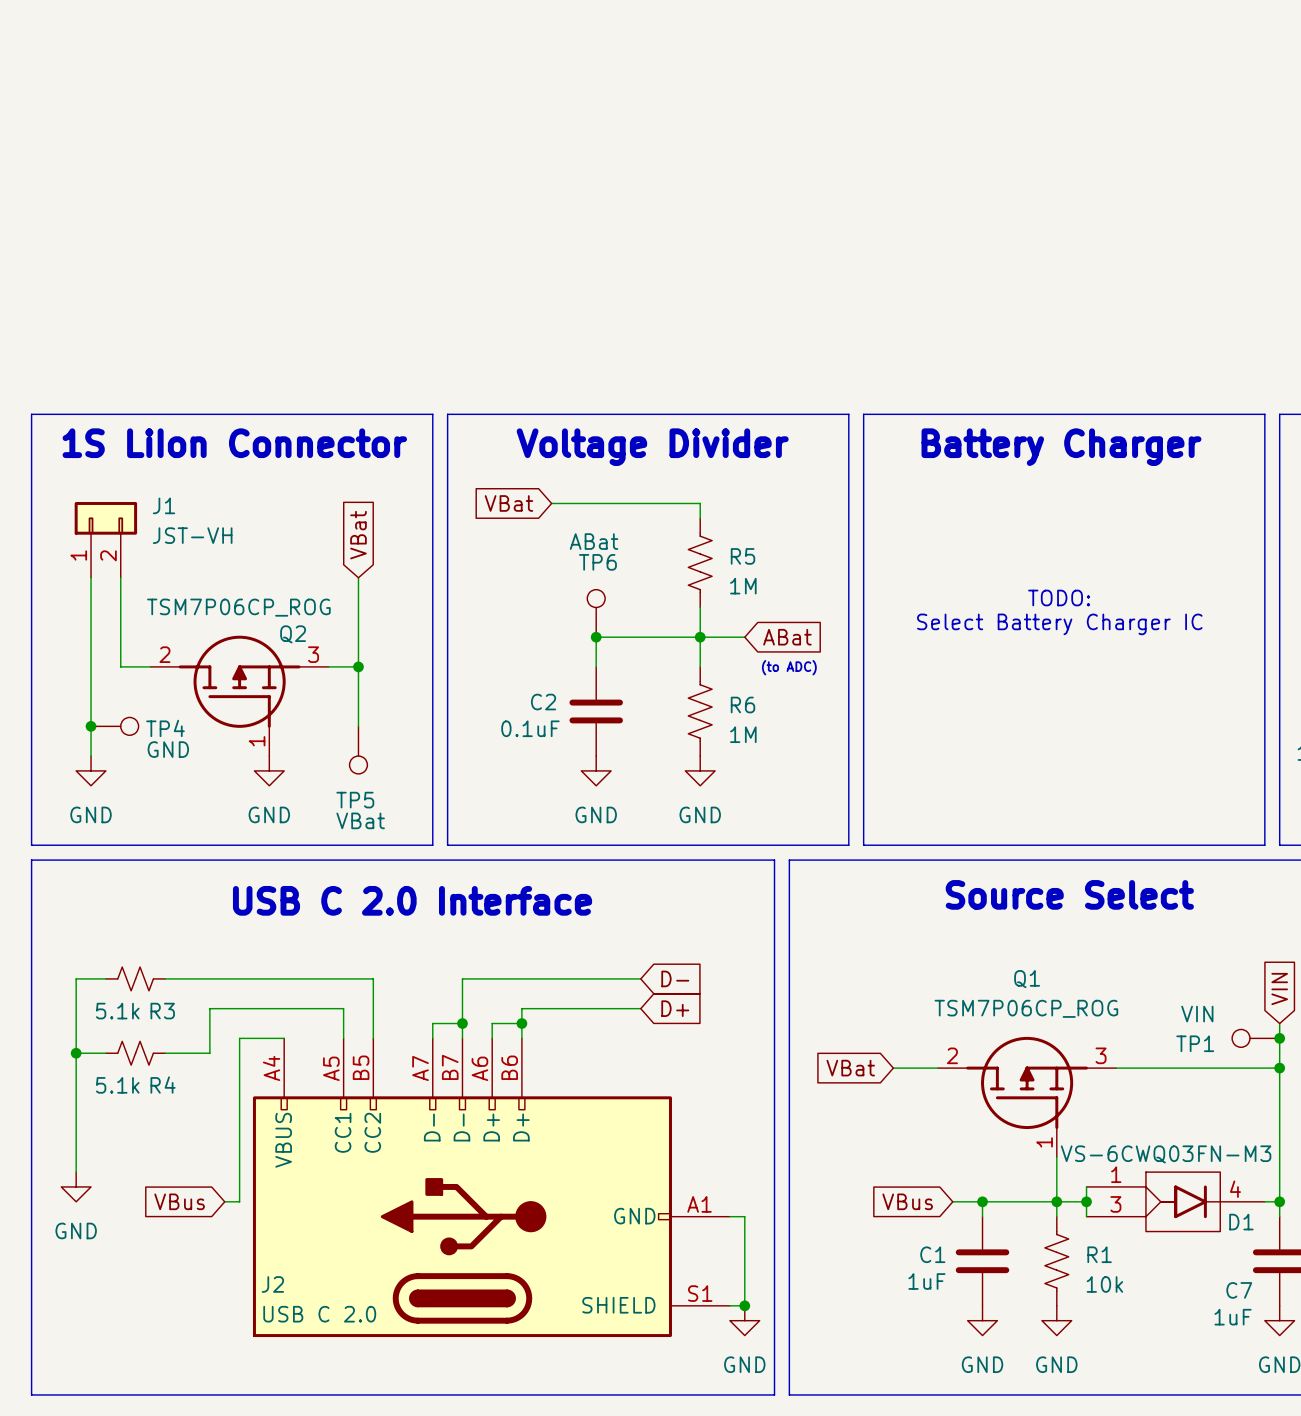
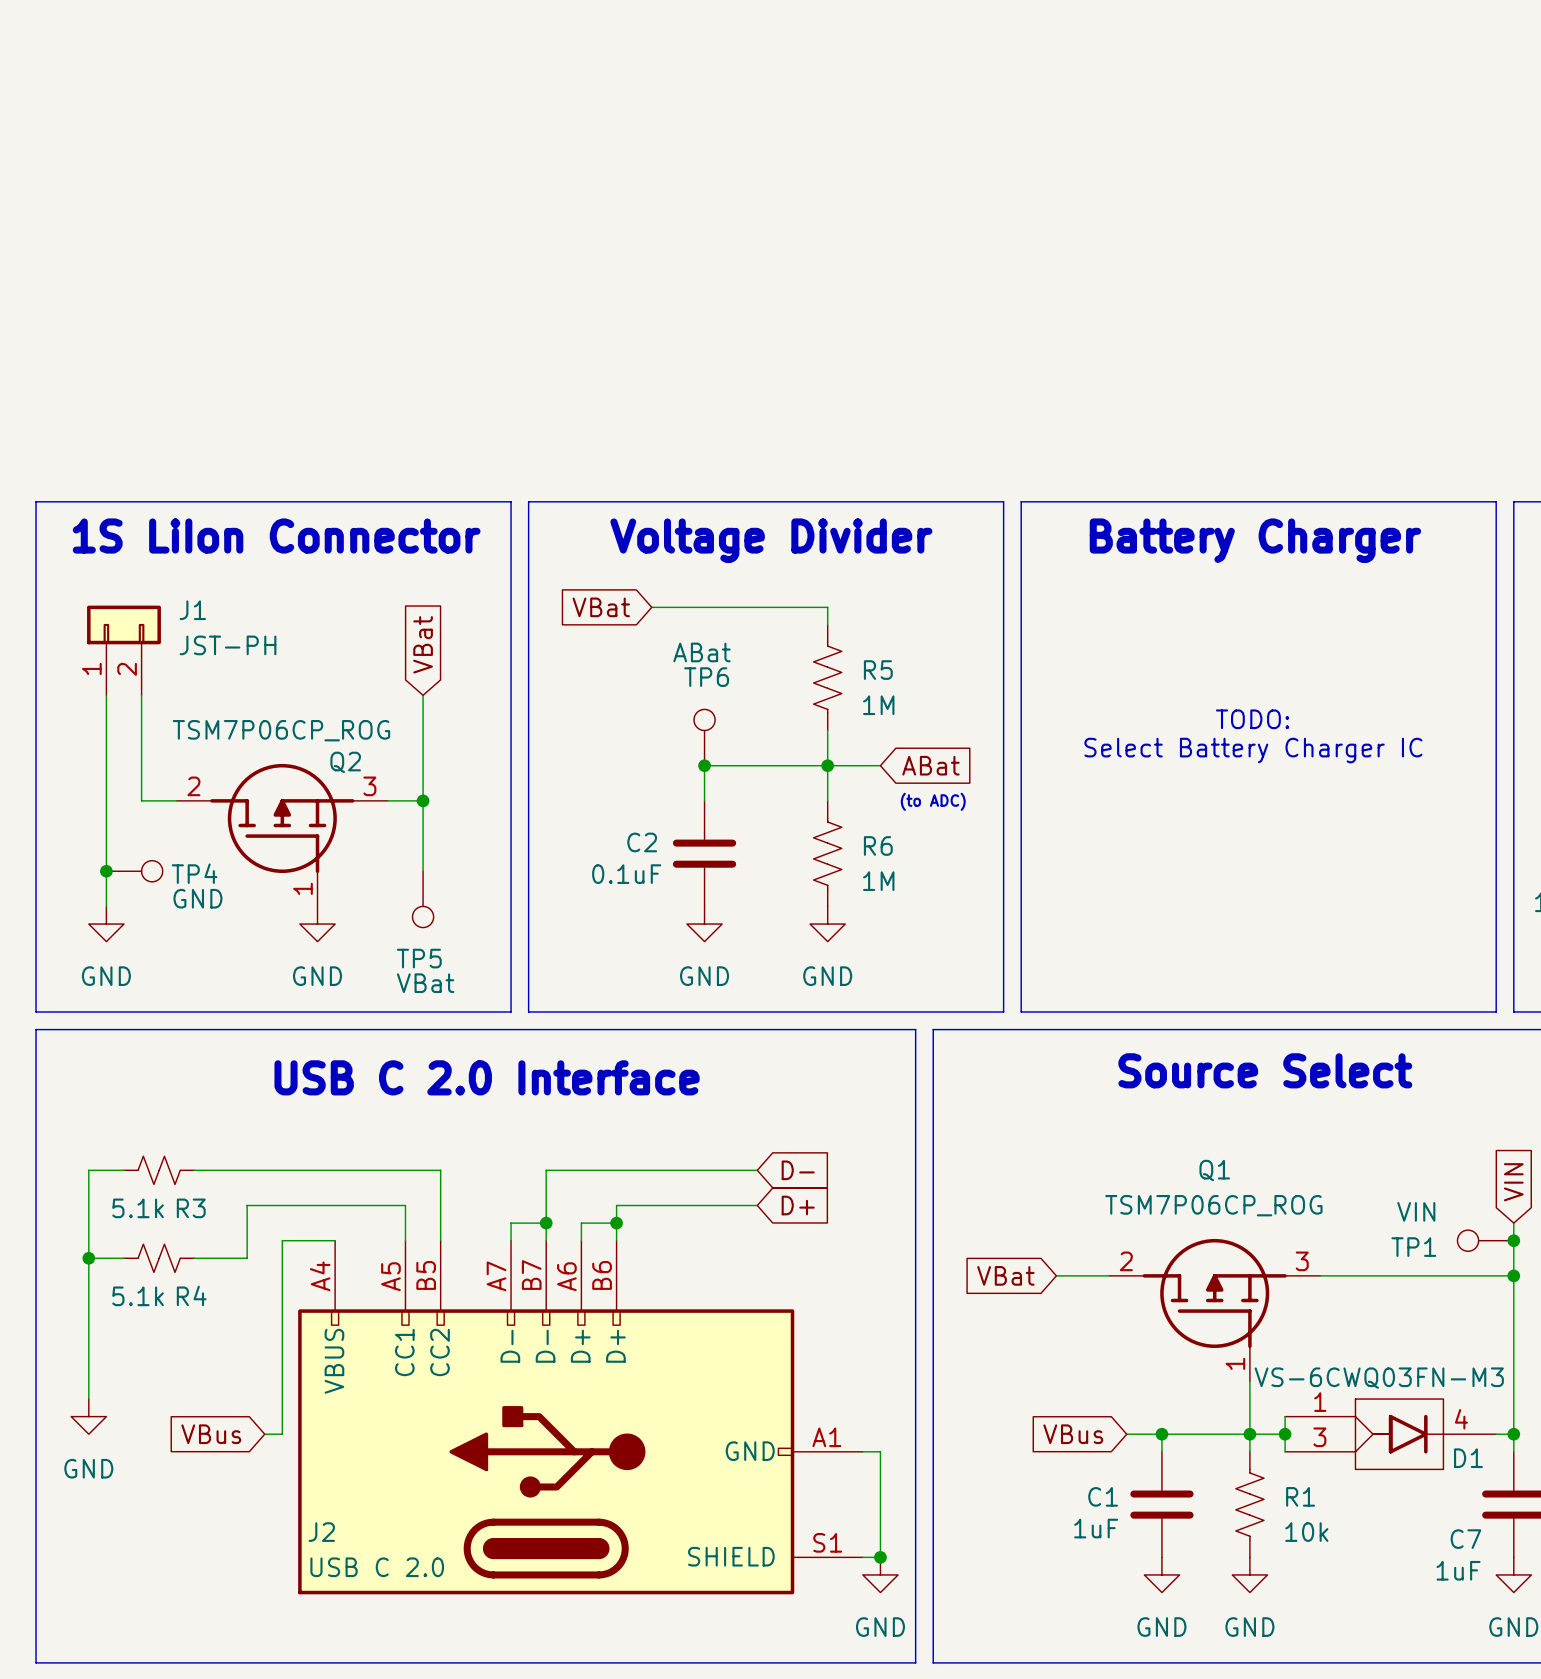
J1 value: JST-VH (192, 535) -> JST-PH (228, 645)

